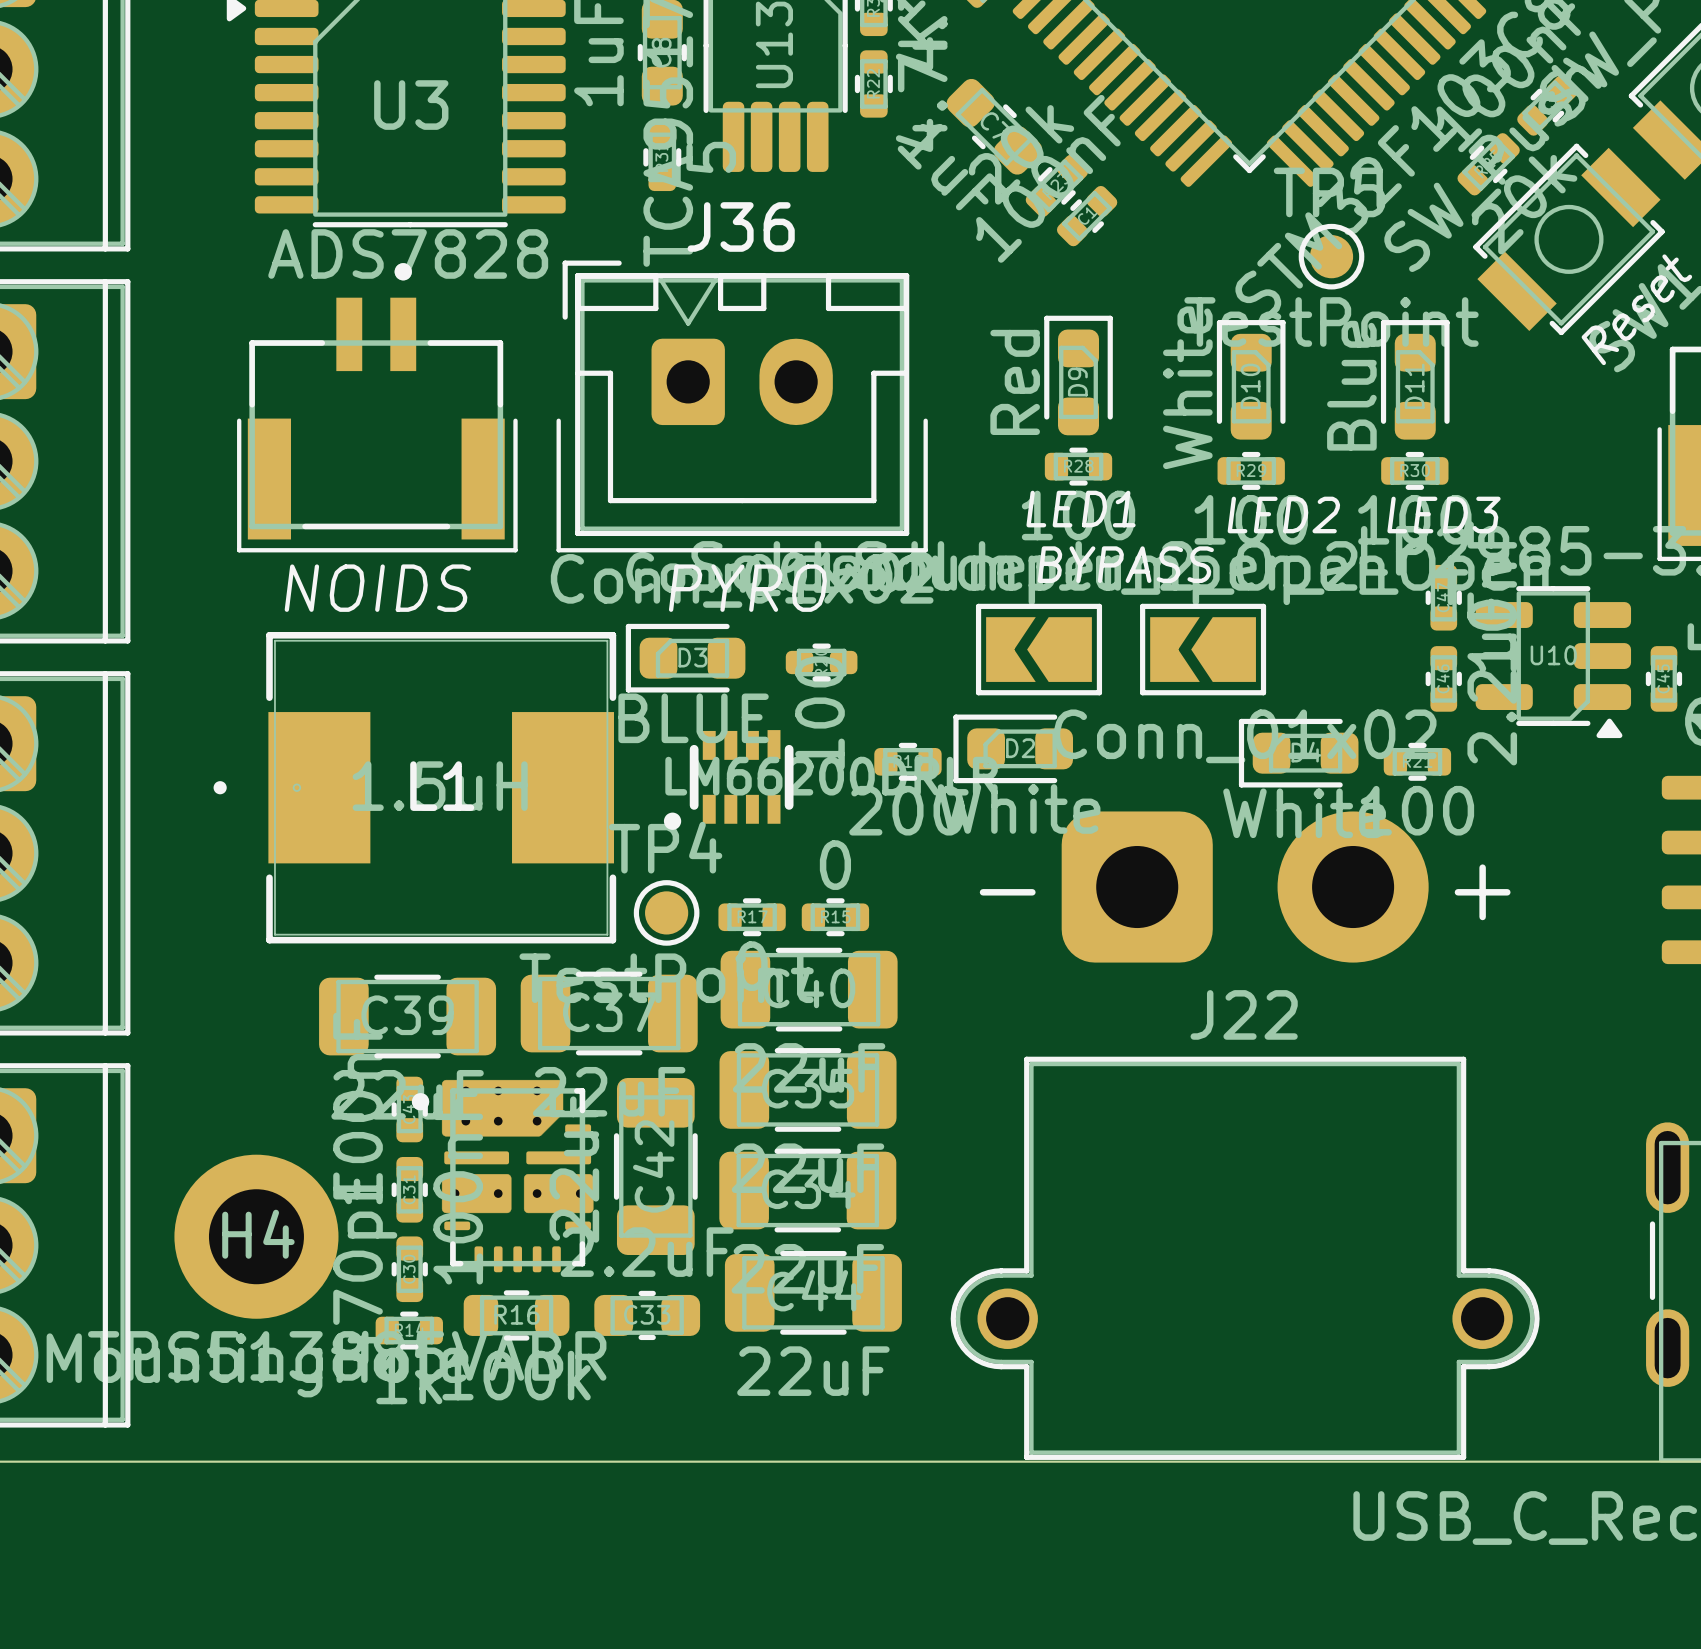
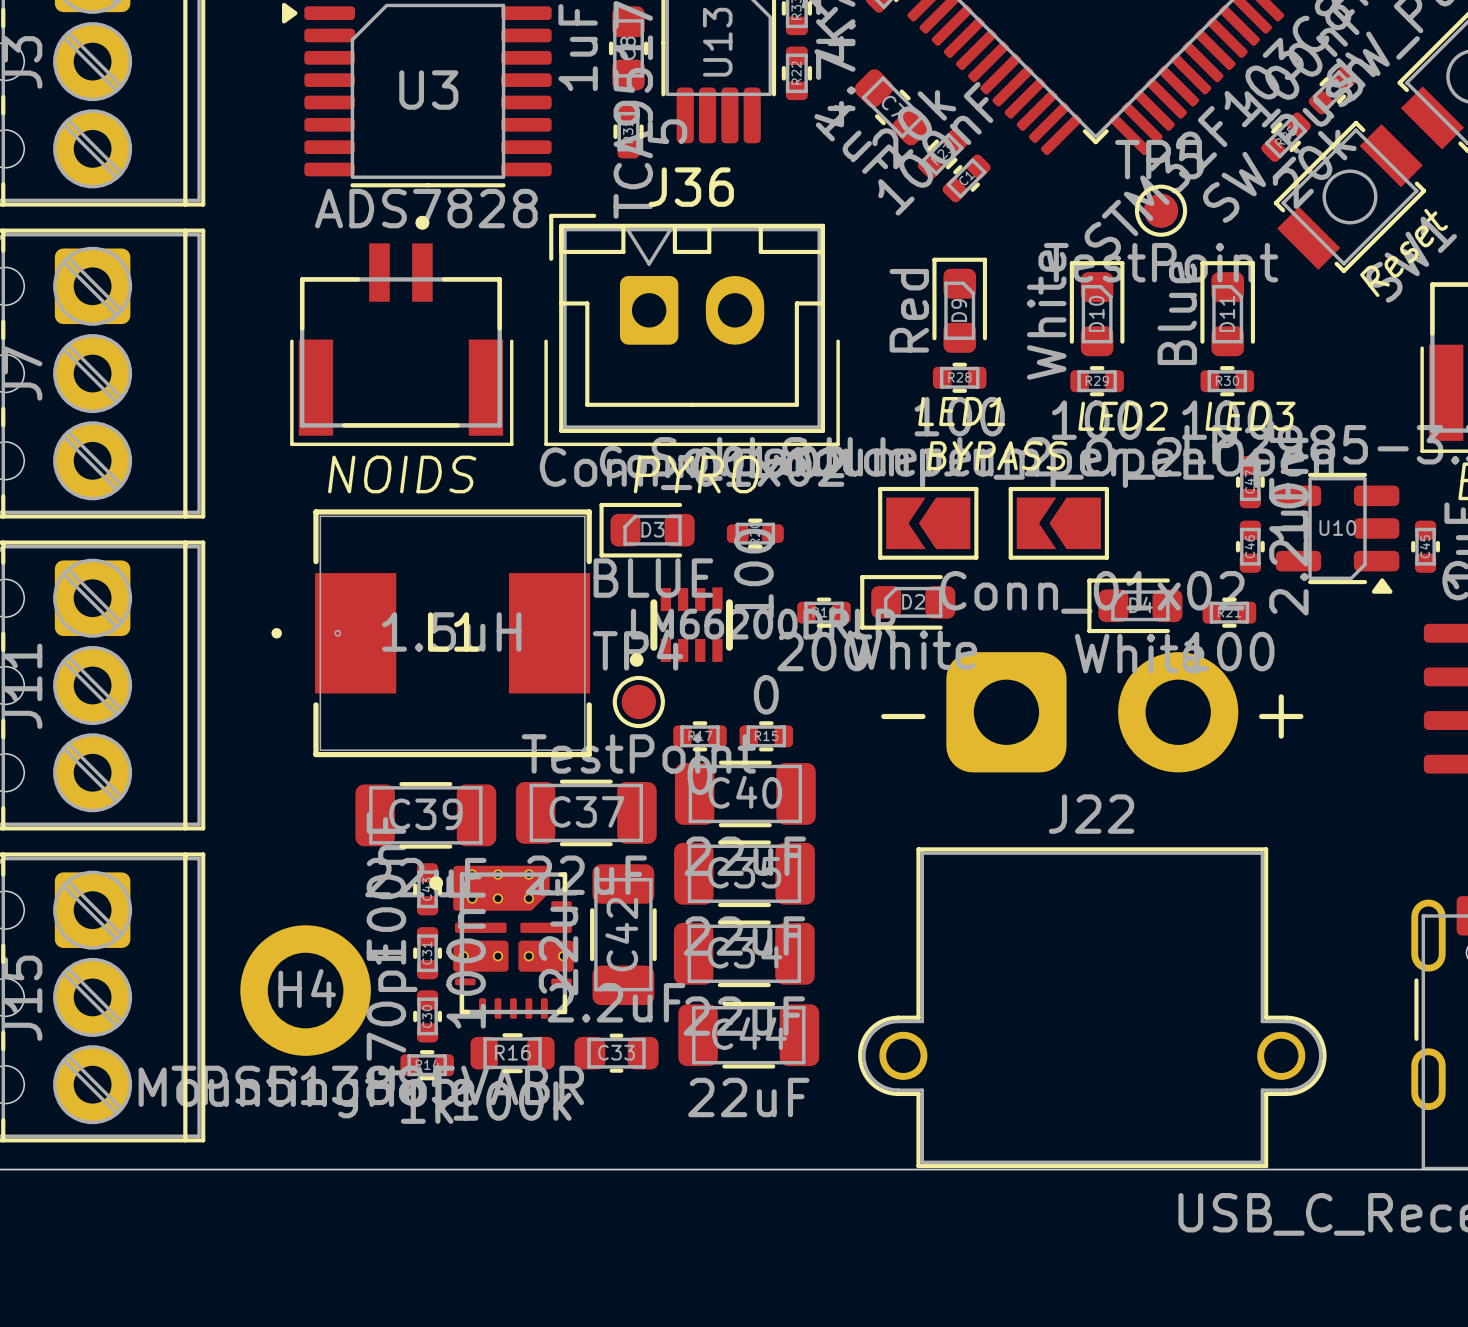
TP4 position: (666, 912) -> (638, 701)

